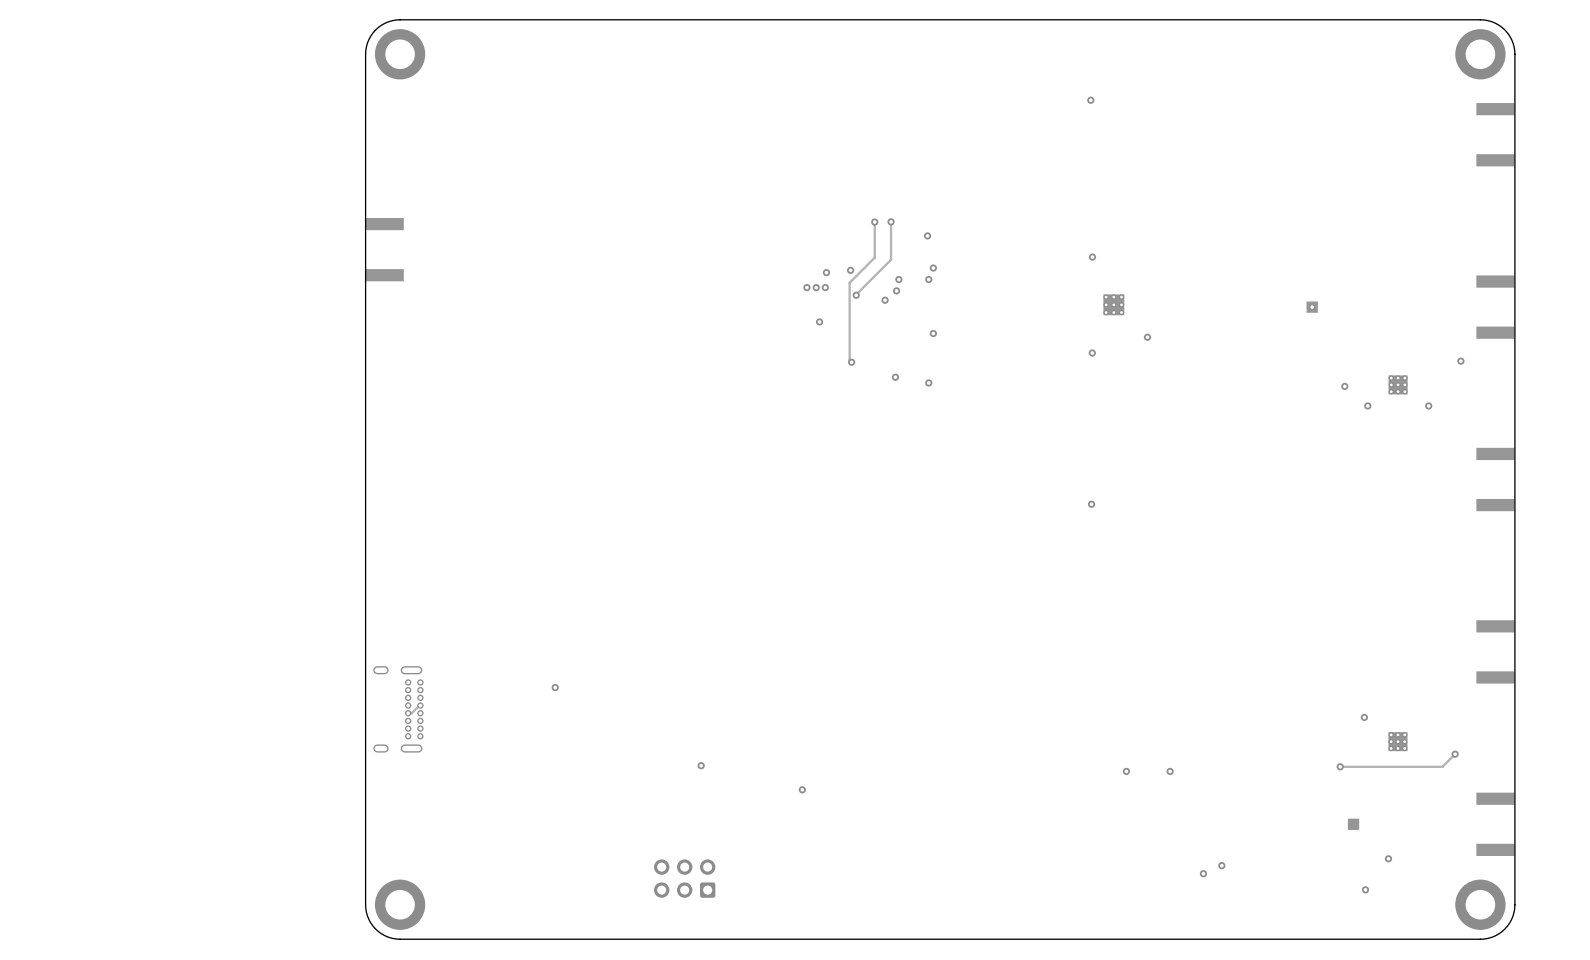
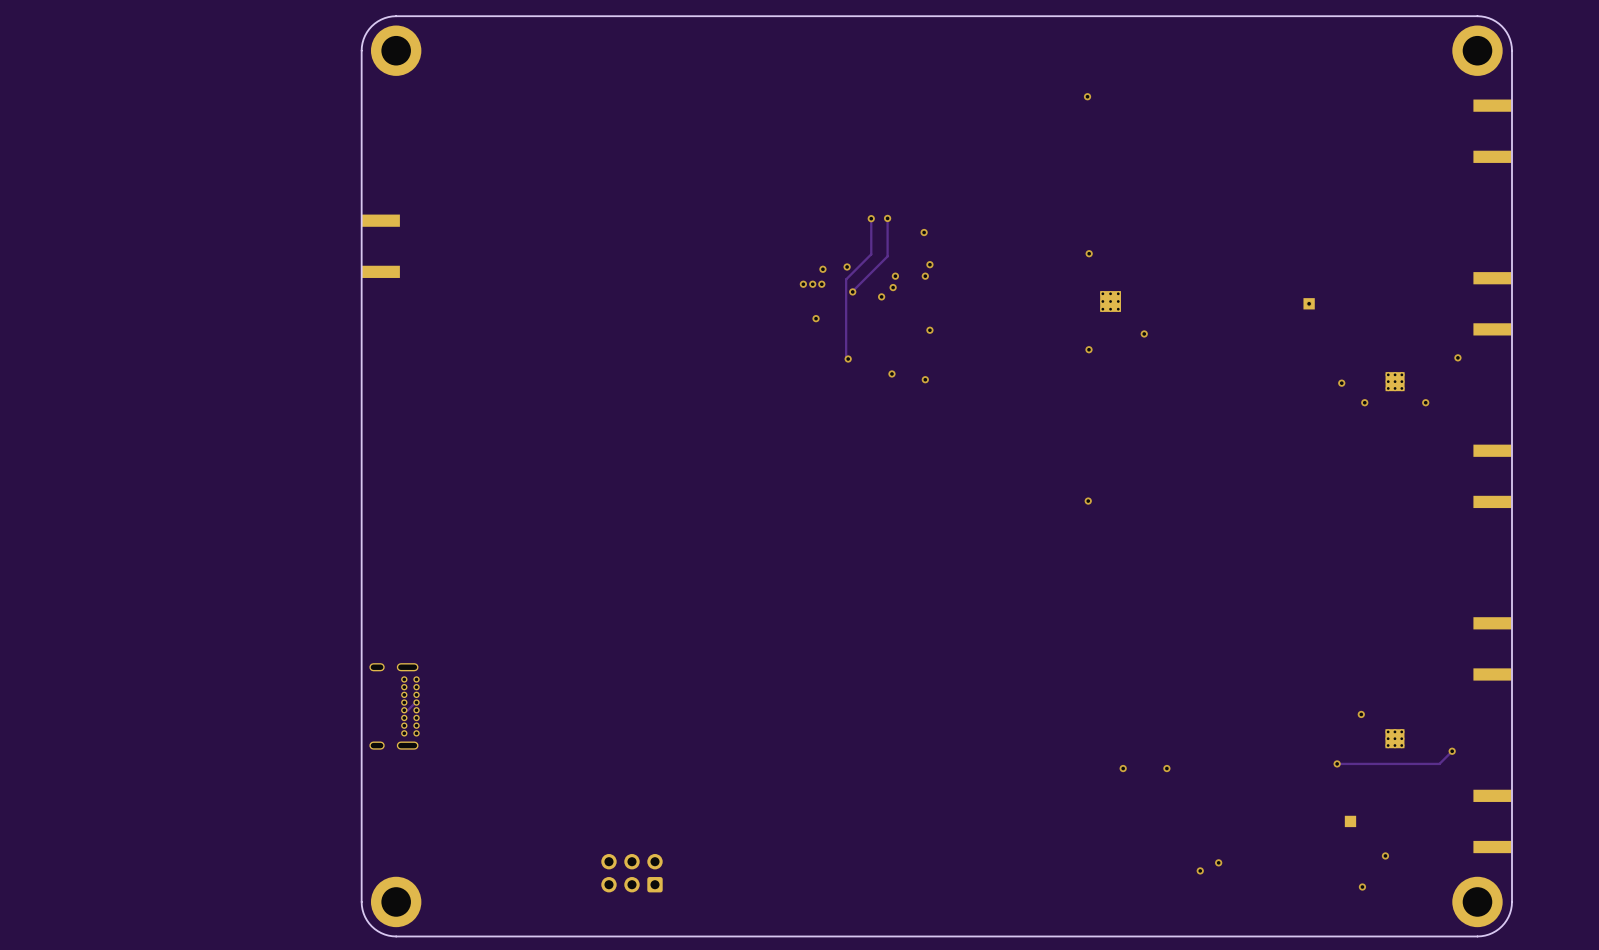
via: (555, 687) -> none
via: (701, 765) -> none
via: (802, 789) -> none
part position: (684, 878) -> (631, 873)

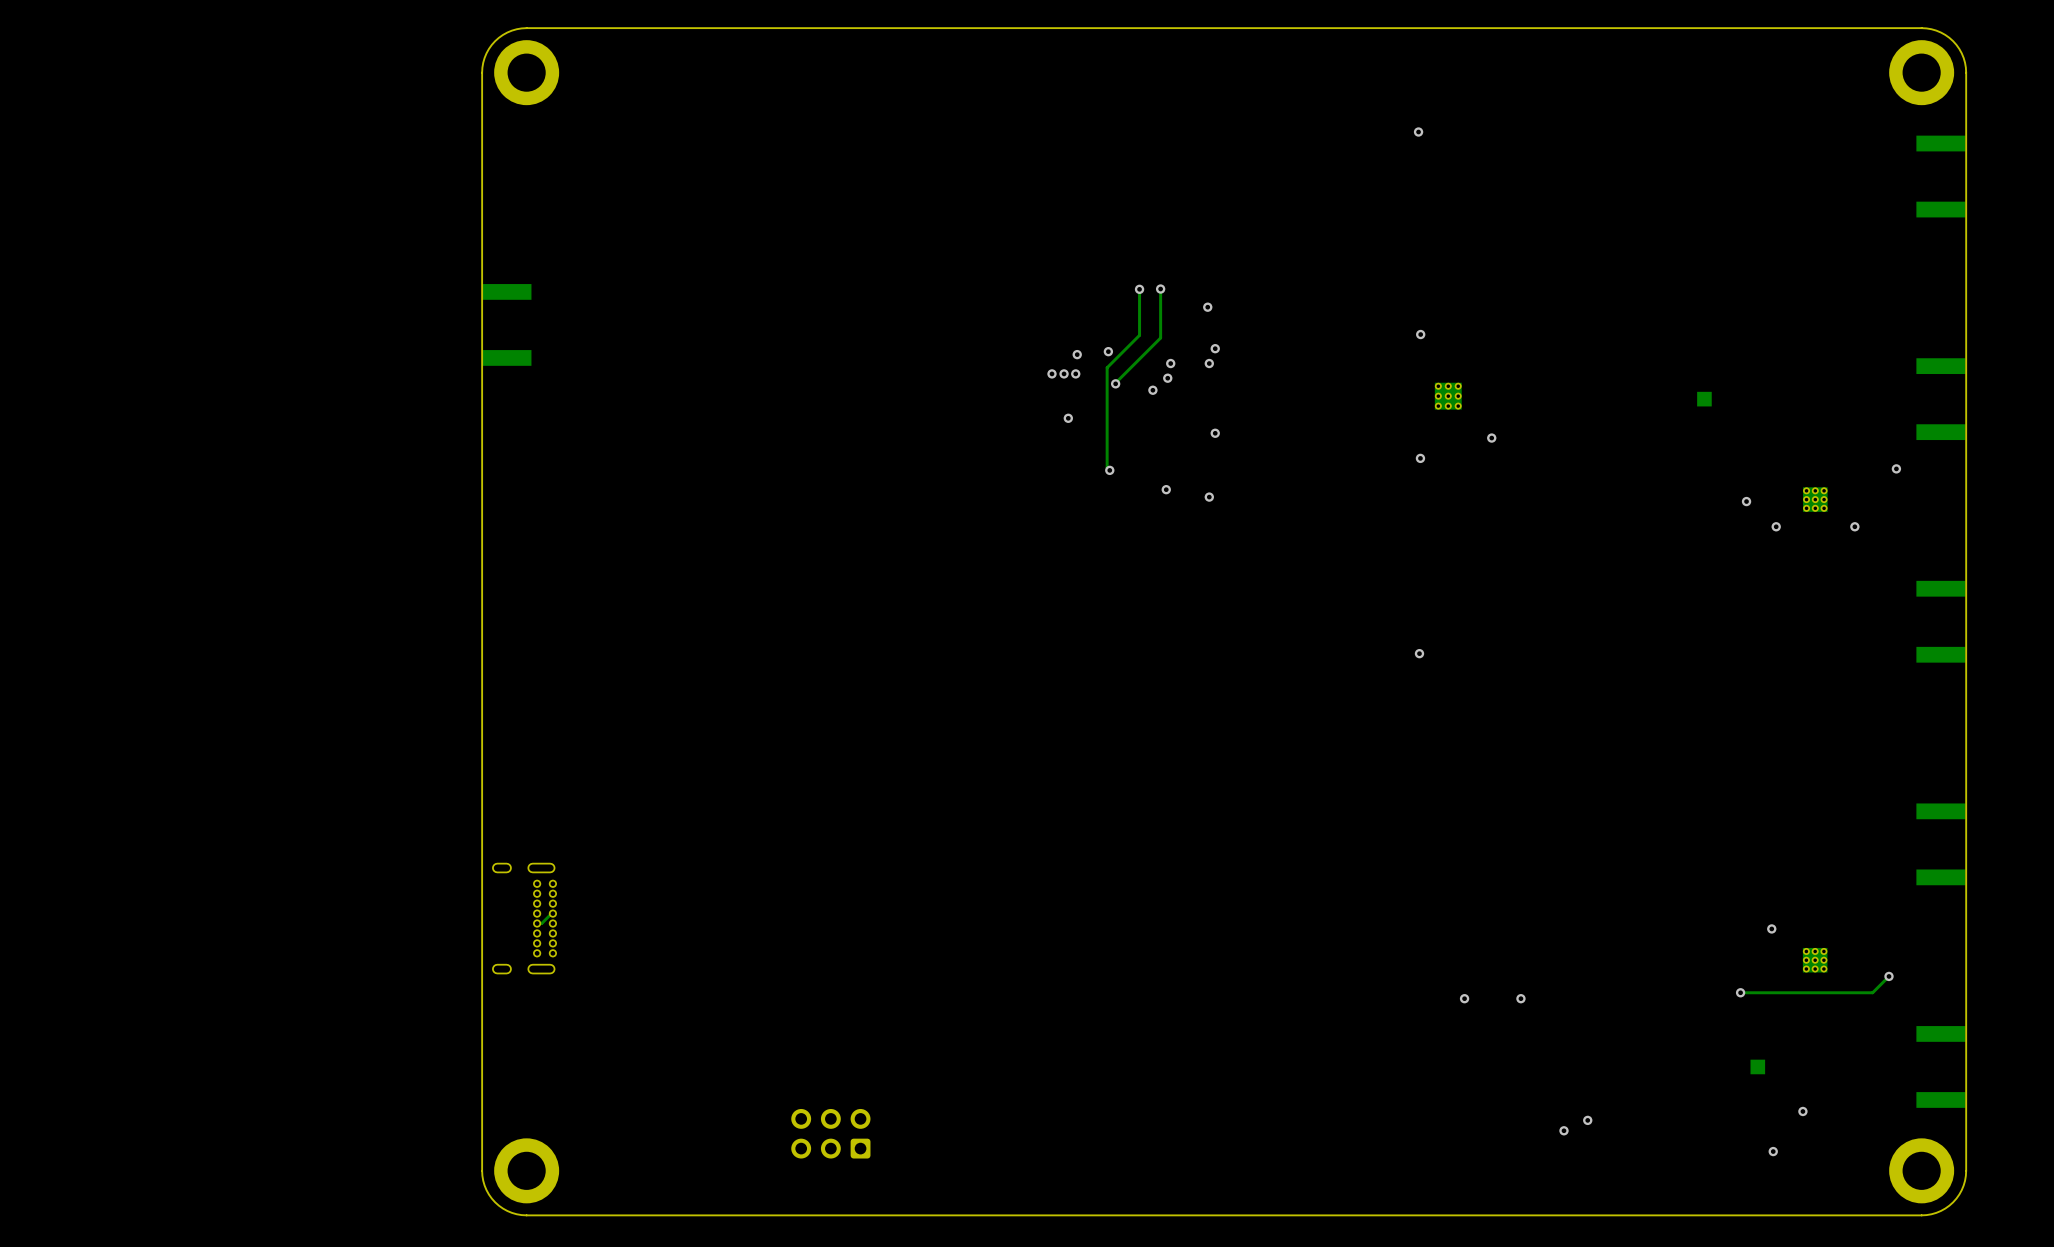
via: (1309, 303) -> none

